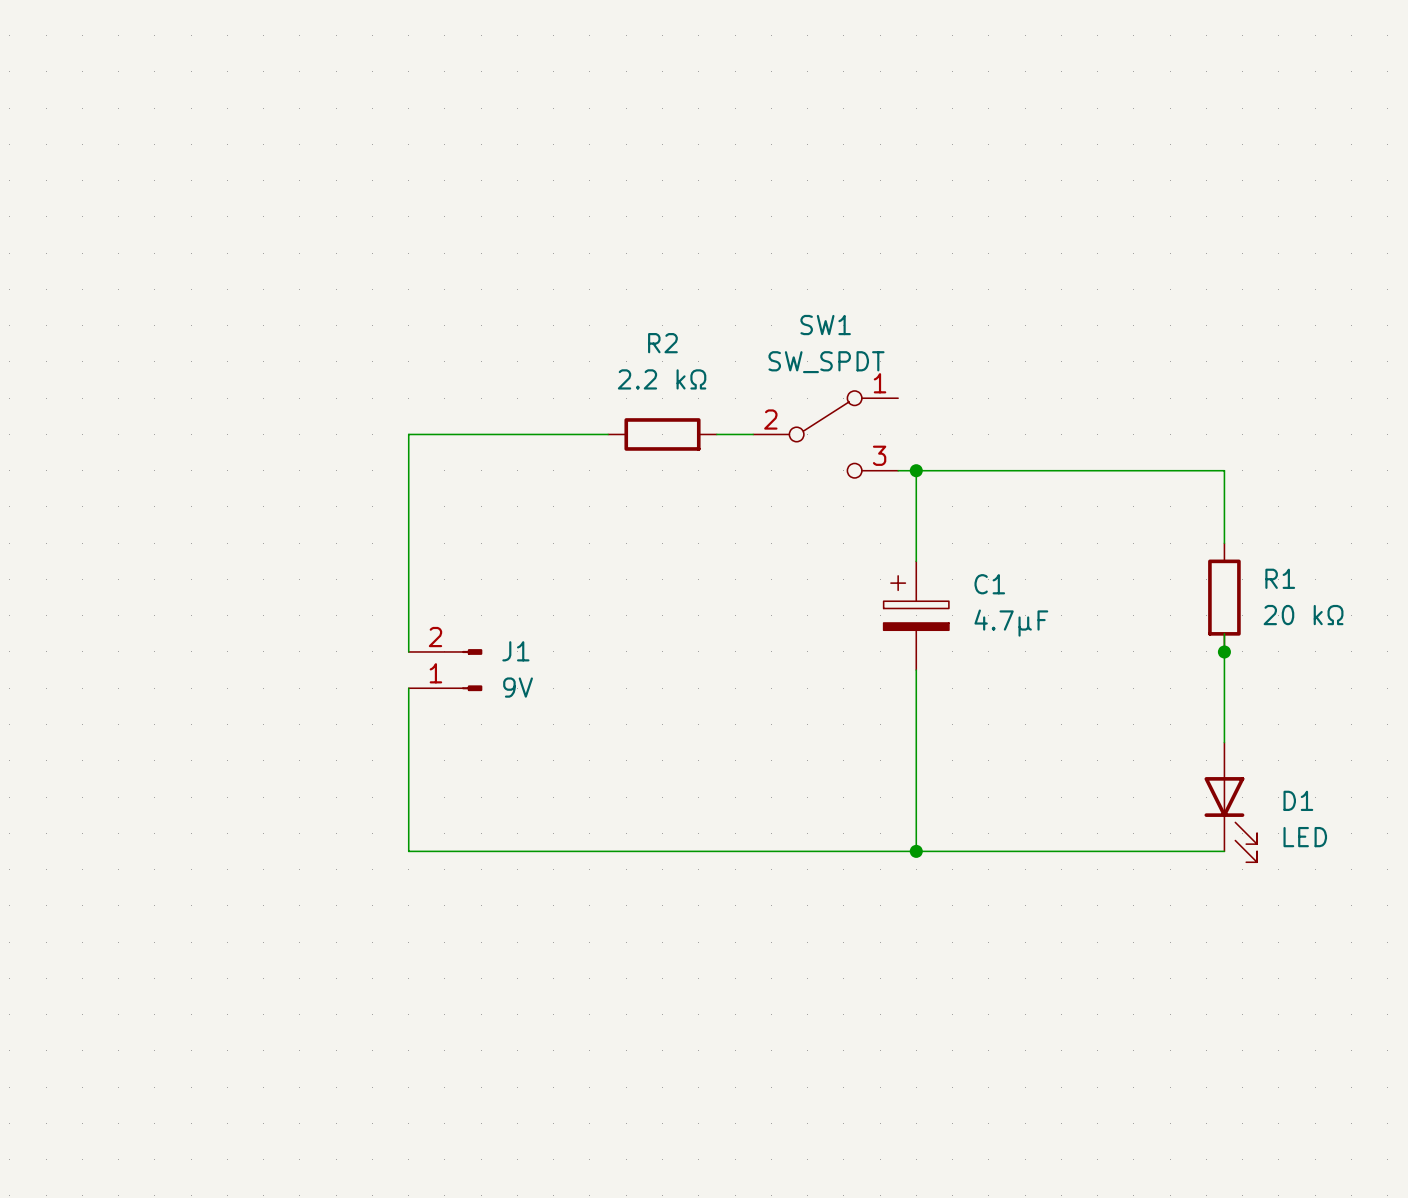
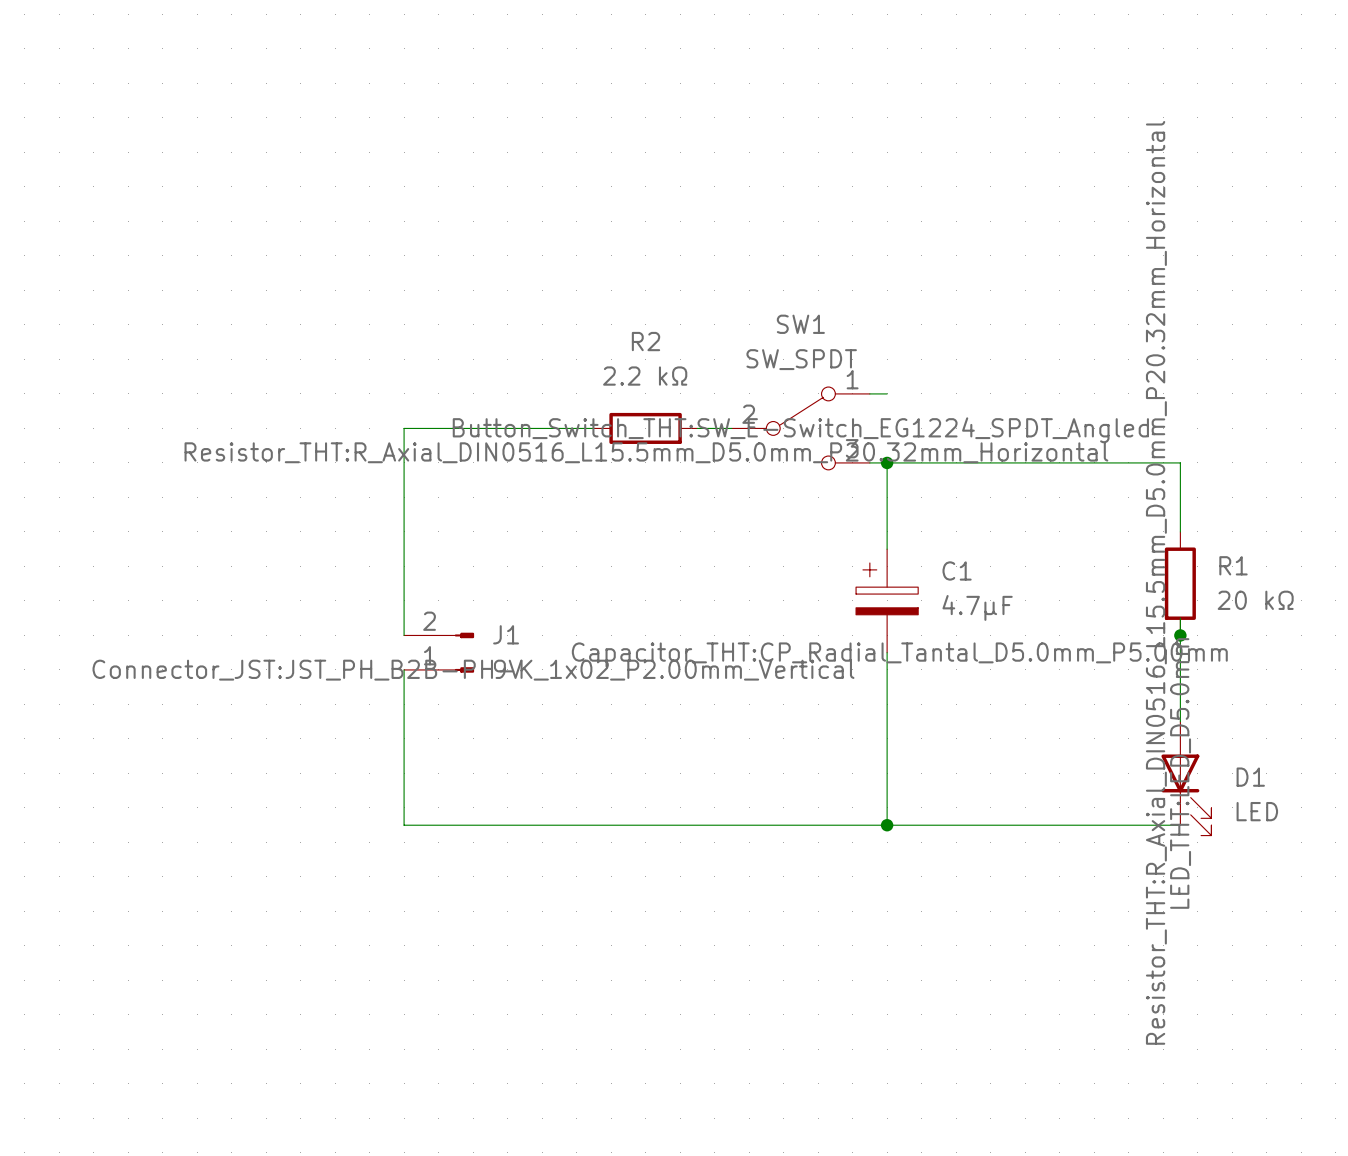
wire: none -> (869, 393) (887, 393)
SW1 text: none -> Button_Switch_THT:SW_E-Switch_EG1224_SPDT_Angled (800, 430)
R2 text: none -> Resistor_THT:R_Axial_DIN0516_L15.5mm_D5.0mm_P20.32mm_Horizontal (646, 452)
R1 text: none -> Resistor_THT:R_Axial_DIN0516_L15.5mm_D5.0mm_P20.32mm_Horizontal (1156, 582)
C1 text: none -> Capacitor_THT:CP_Radial_Tantal_D5.0mm_P5.00mm (899, 654)
J1 text: none -> Connector_JST:JST_PH_B2B-PH-K_1x02_P2.00mm_Vertical (473, 670)
D1 text: none -> LED_THT:LED_D5.0mm (1180, 773)

